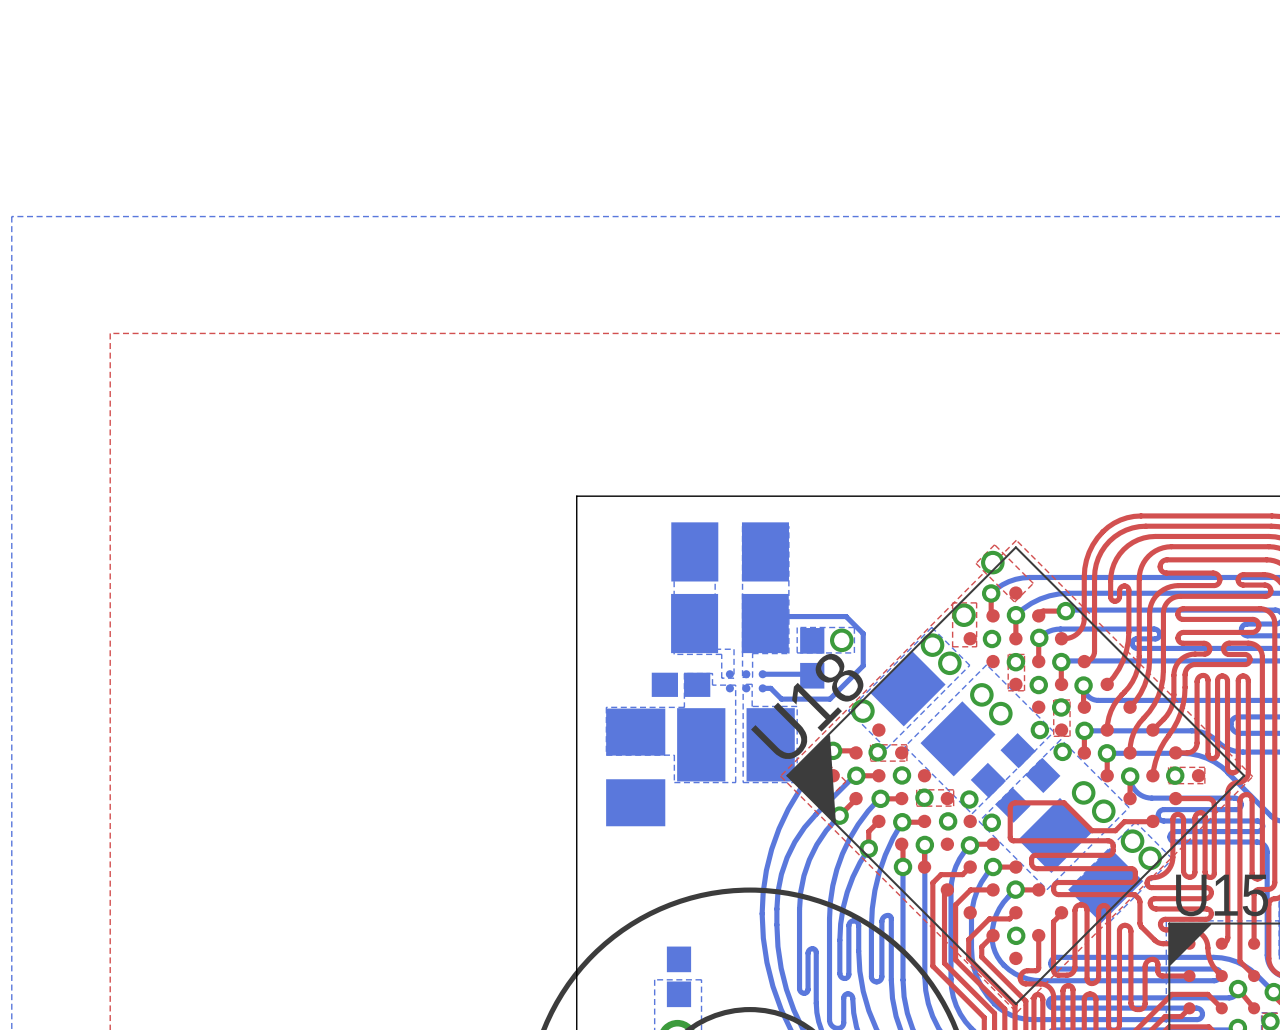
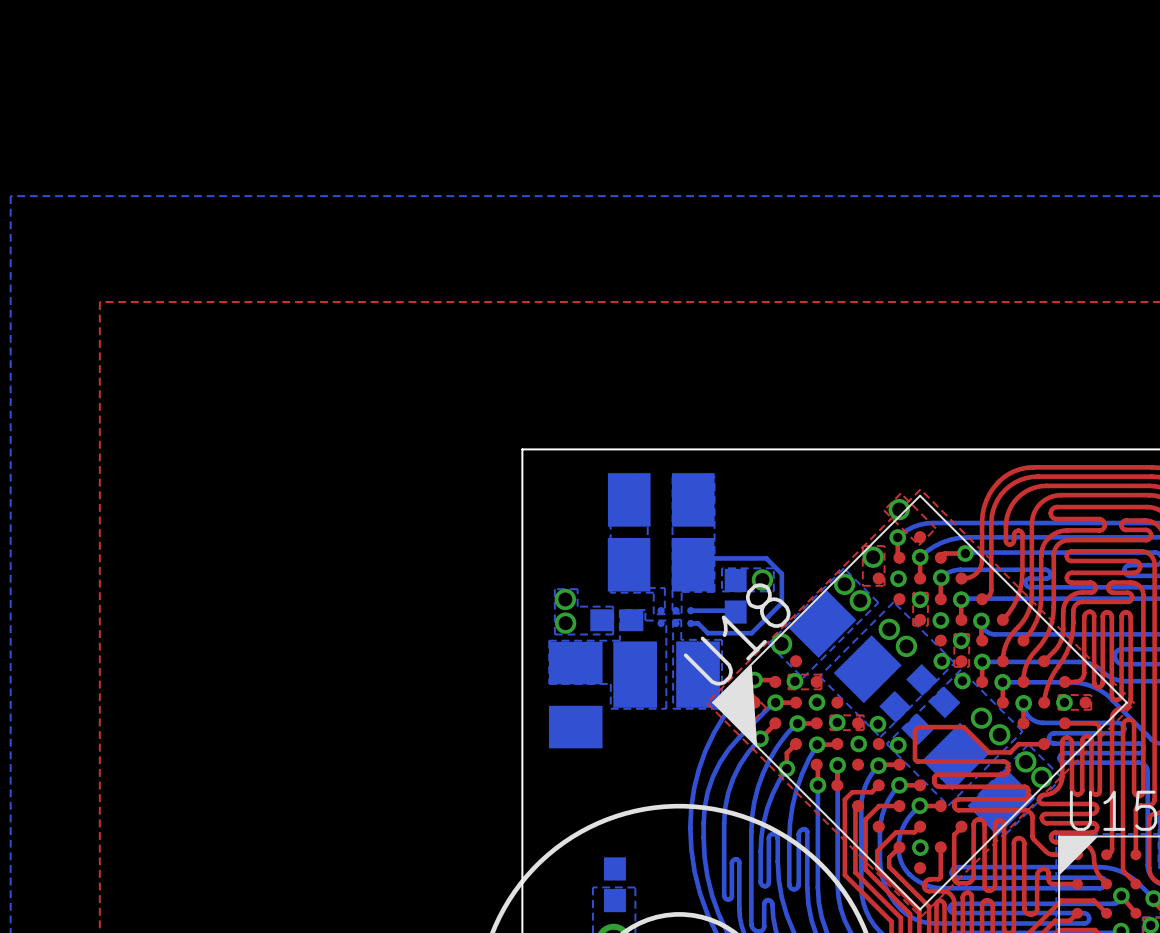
bottom zone outline: none -> (554, 589) (554, 634) (613, 634) (613, 606) (577, 606) (577, 589) (554, 589)
via: none -> (565, 599)
via: none -> (565, 623)

